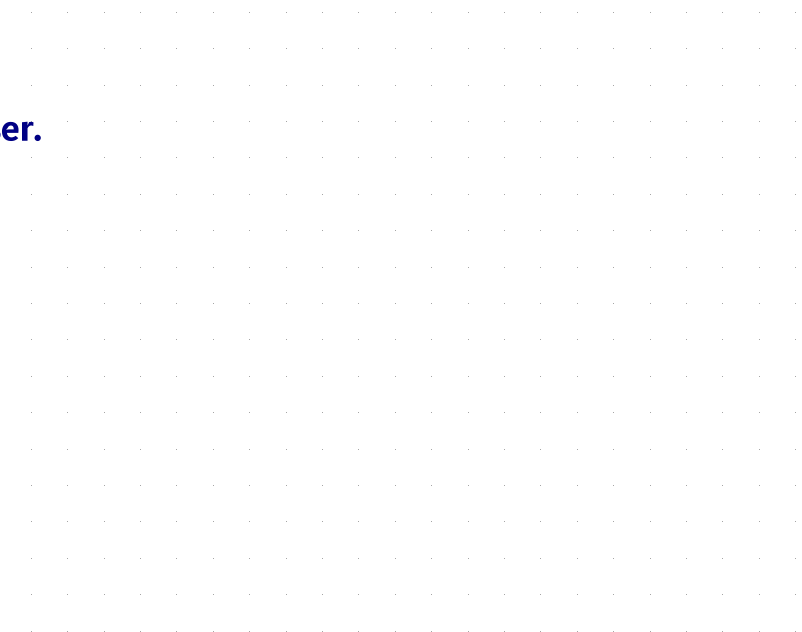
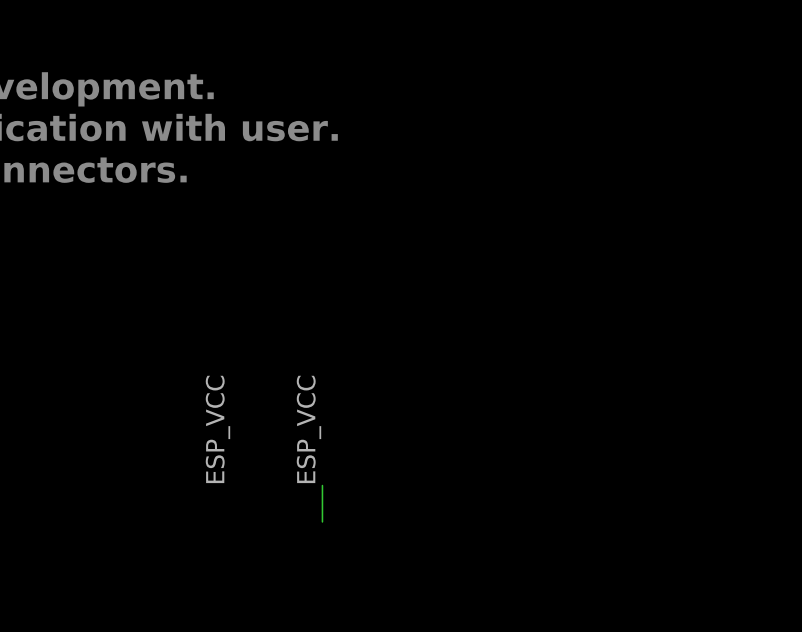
label: none -> ESP_VCC (217, 429)
label: none -> ESP_VCC (308, 429)
wire: none -> (322, 485) (322, 521)

